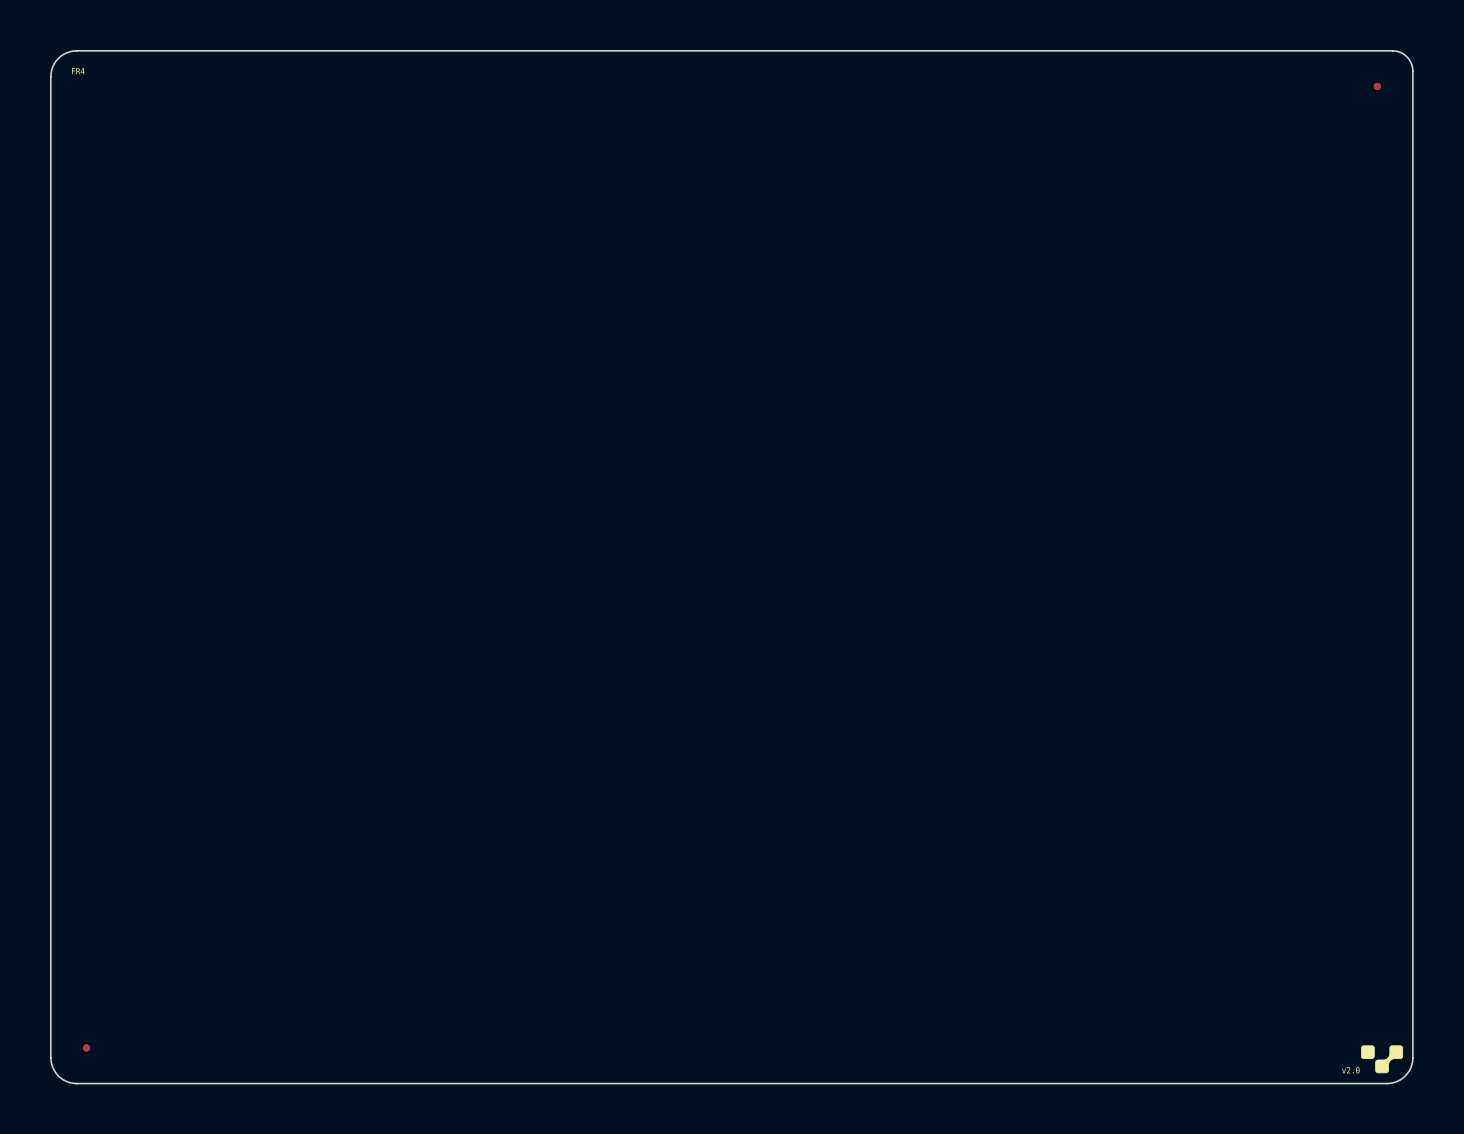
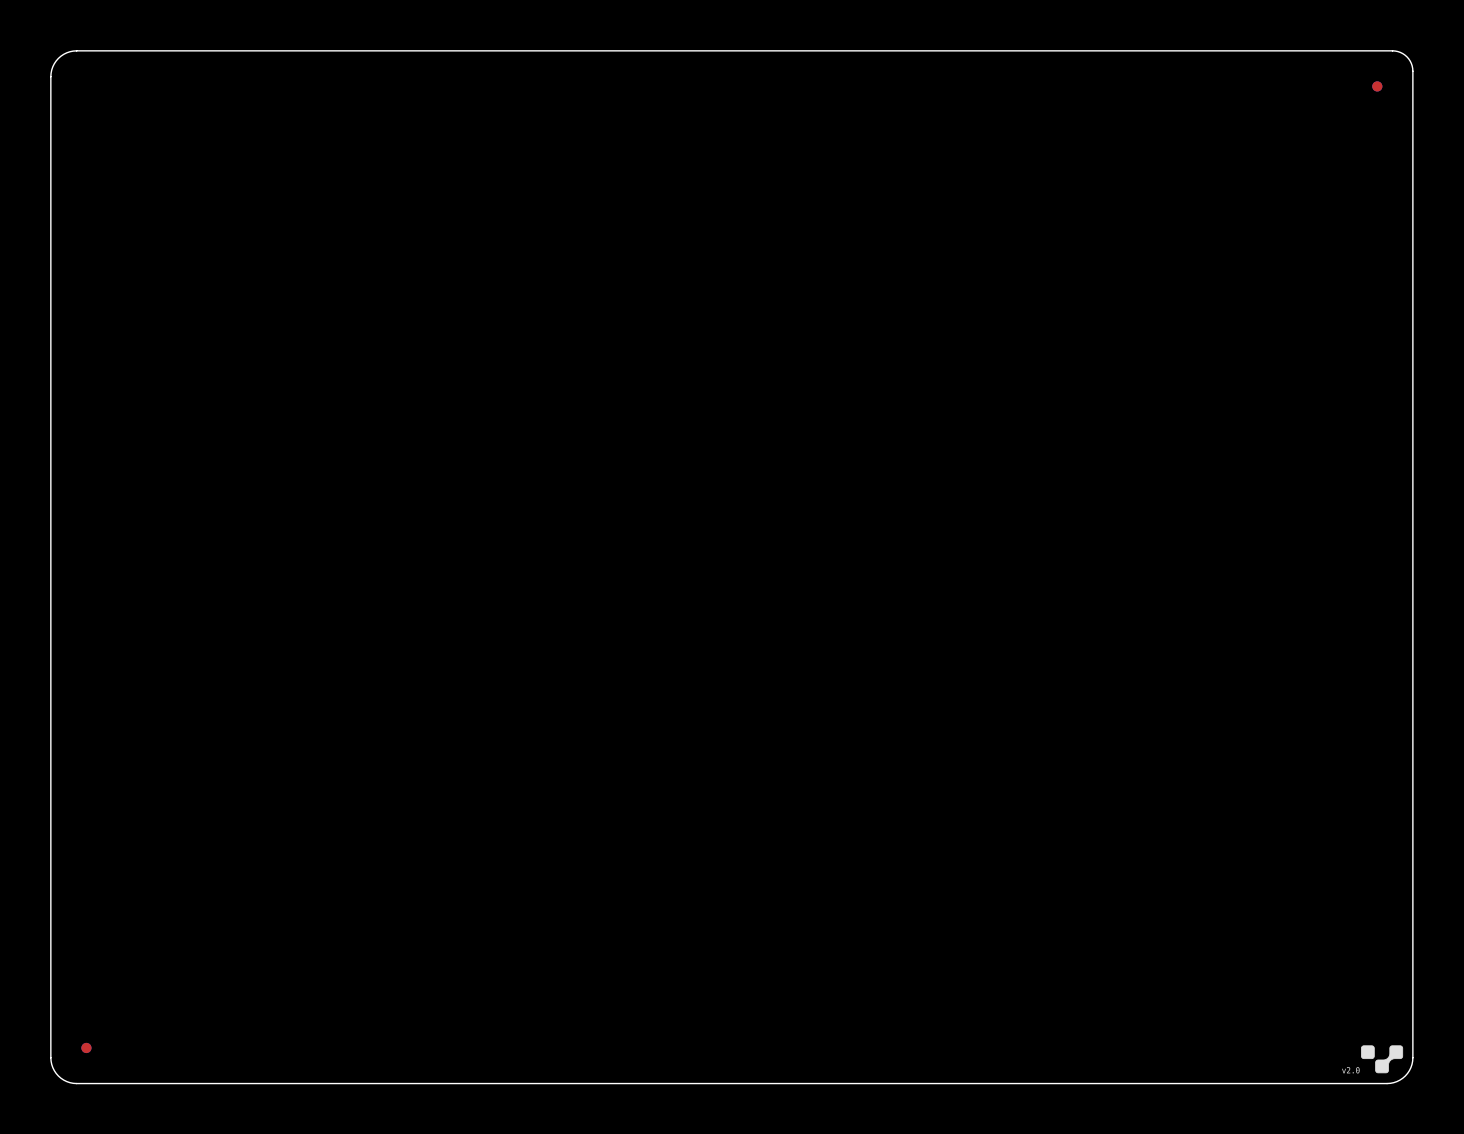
part footprint: [50, 50, 1414, 1085] -> [50, 50, 1414, 1085]

